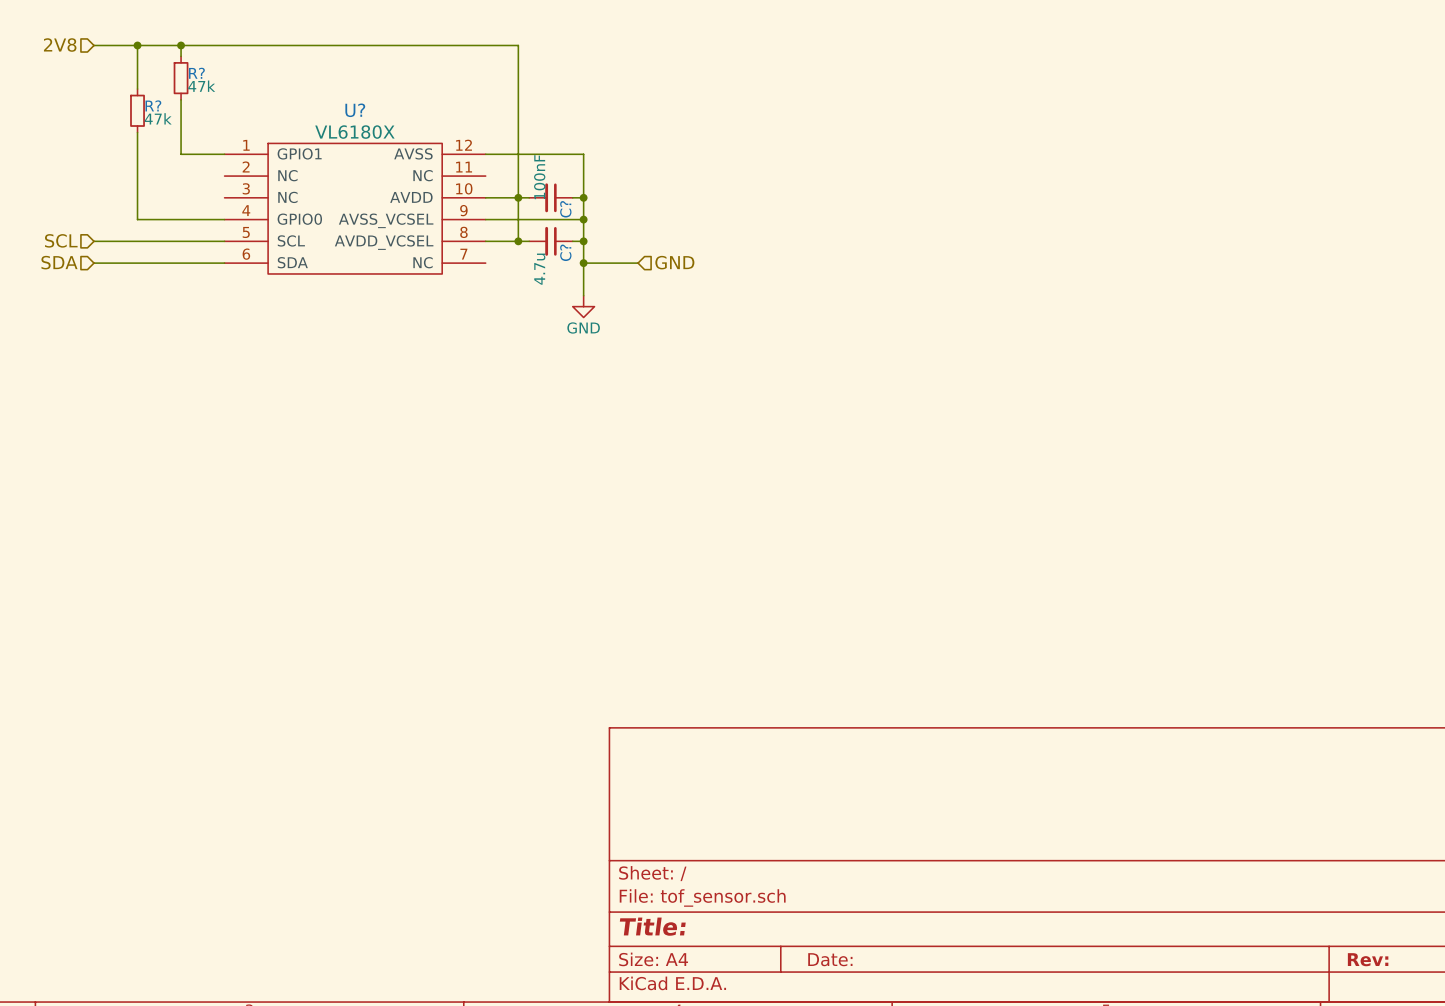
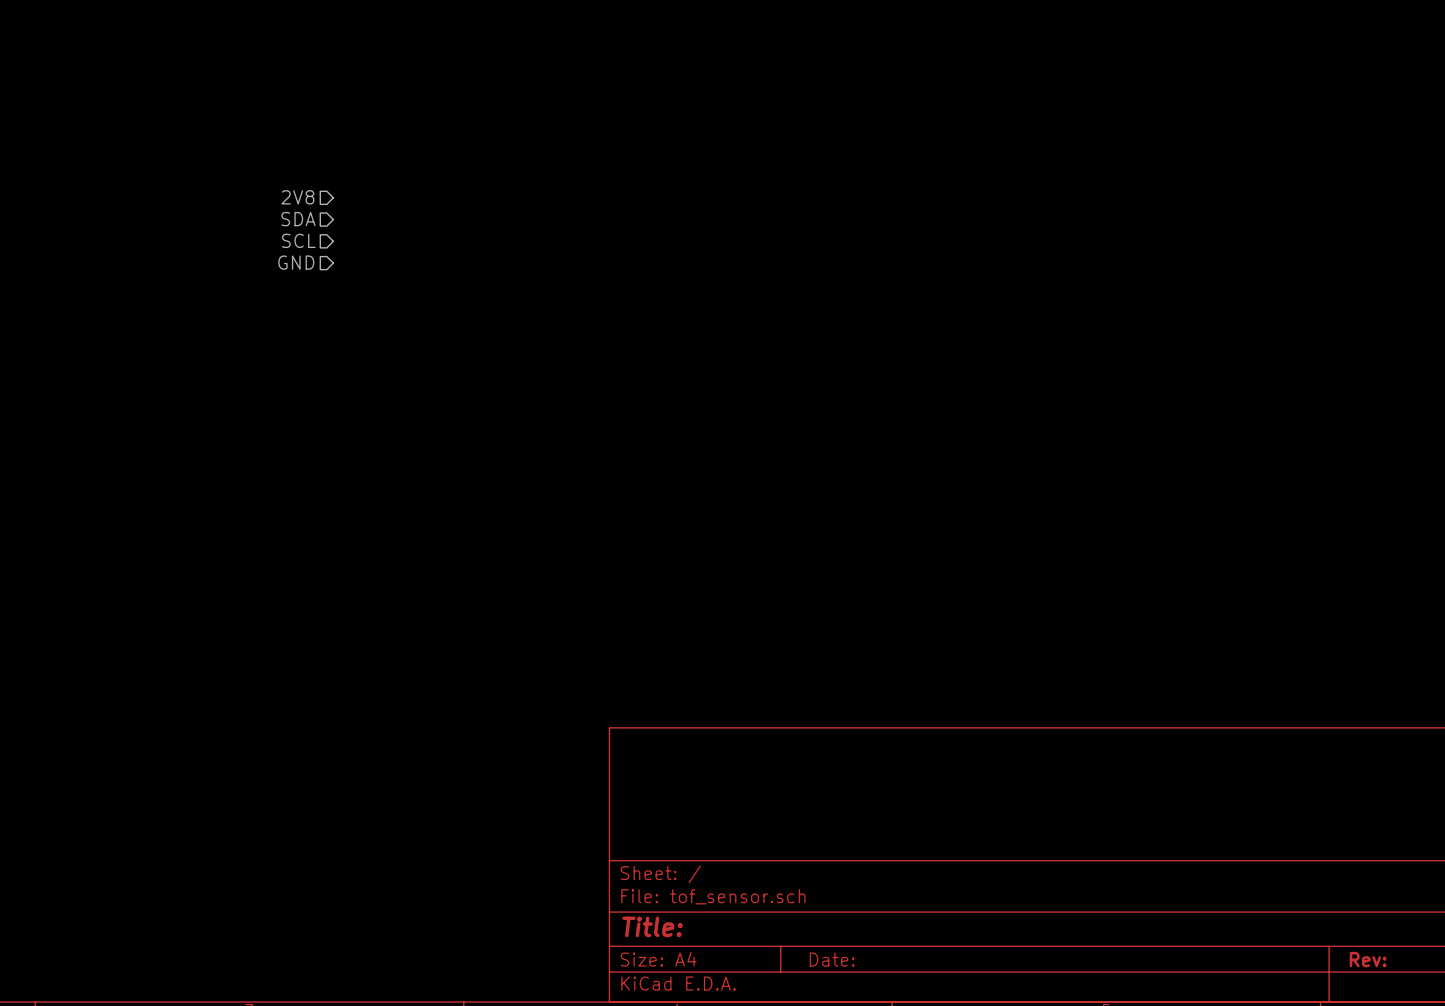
hierarchical label: 2V8 (60, 45) -> none
wire: (94, 45) (518, 45) (518, 241) -> none
wire: (137, 45) (137, 89) -> none
junction: (137, 45) -> none
wire: (181, 45) (181, 56) -> none
junction: (181, 45) -> none
R?: 47k (181, 78) -> none
wire: (181, 99) (181, 154) (224, 154) -> none
R?: 47k (137, 110) -> none
wire: (137, 132) (137, 219) (224, 219) -> none
wire: (485, 154) (583, 154) (583, 295) -> none
hierarchical label: none -> 2V8 (297, 197)
wire: (485, 197) (529, 197) -> none
junction: (518, 197) -> none
C?: 100nF (550, 197) -> none
wire: (572, 197) (583, 197) -> none
junction: (583, 197) -> none
U?: VL6180X (355, 208) -> none
hierarchical label: none -> SDA (298, 219)
wire: (485, 219) (583, 219) -> none
junction: (583, 219) -> none
hierarchical label: SCL (61, 240) -> none
hierarchical label: none -> SCL (298, 240)
wire: (94, 241) (224, 241) -> none
wire: (485, 241) (529, 241) -> none
junction: (518, 241) -> none
C?: 4.7u (550, 241) -> none
wire: (572, 241) (583, 241) -> none
junction: (583, 241) -> none
hierarchical label: SDA (59, 262) -> none
hierarchical label: none -> GND (296, 262)
hierarchical label: GND (674, 262) -> none
wire: (94, 263) (224, 263) -> none
wire: (583, 263) (638, 263) -> none
junction: (583, 263) -> none
power symbol: GND (583, 306) -> none

